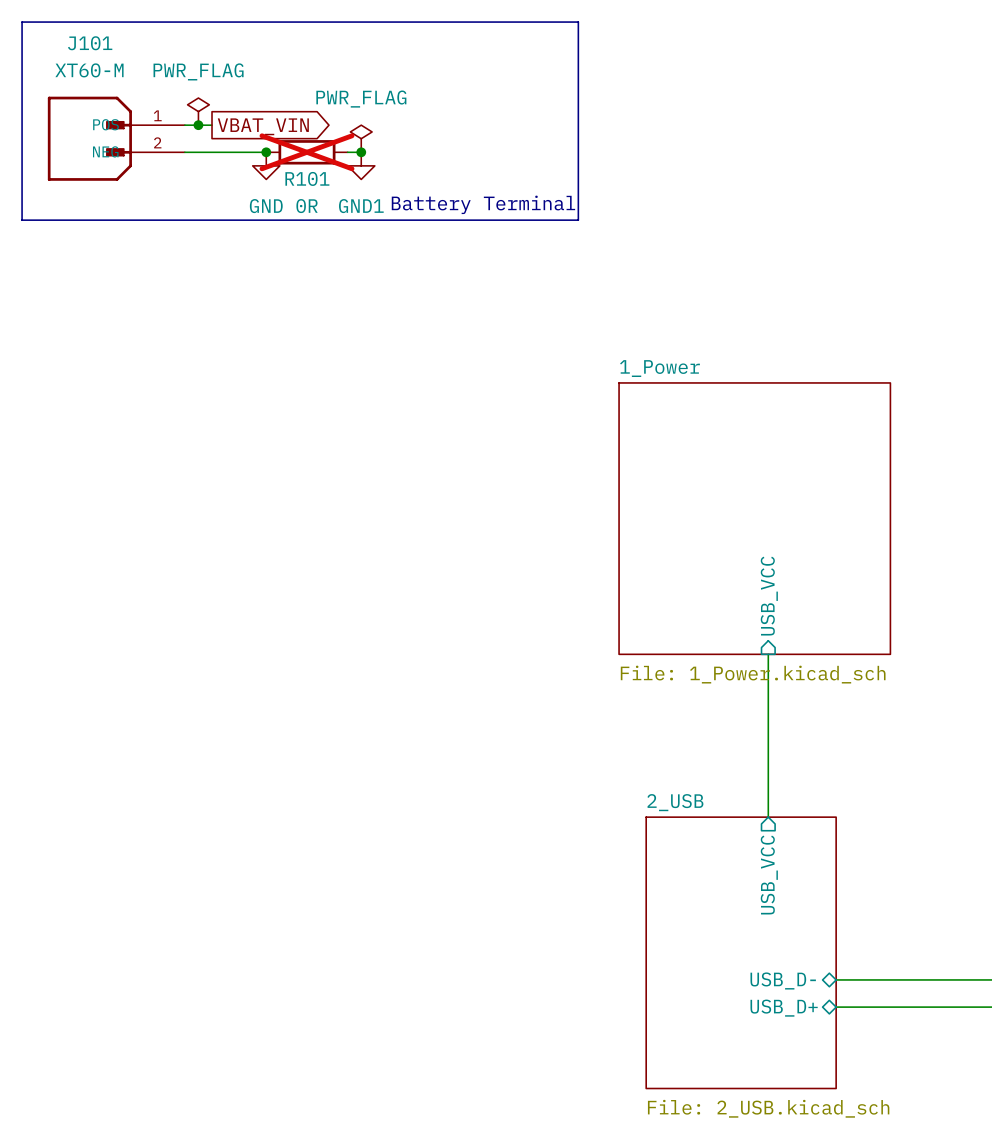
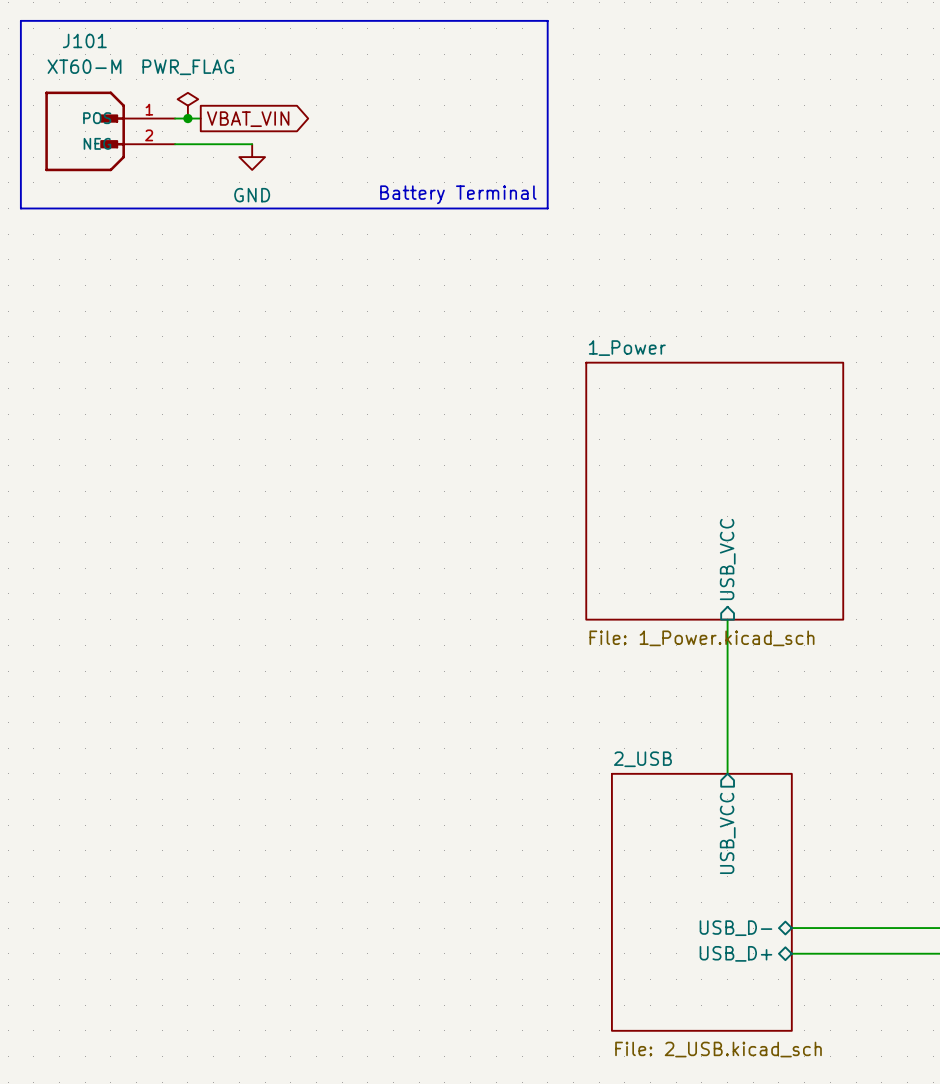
power symbol: PWR_FLAG (361, 138) -> none
junction: (266, 152) -> none
R101: 0R (306, 152) -> none
wire: (347, 152) (361, 152) -> none
junction: (361, 152) -> none
power symbol: GND1 (361, 165) -> none

